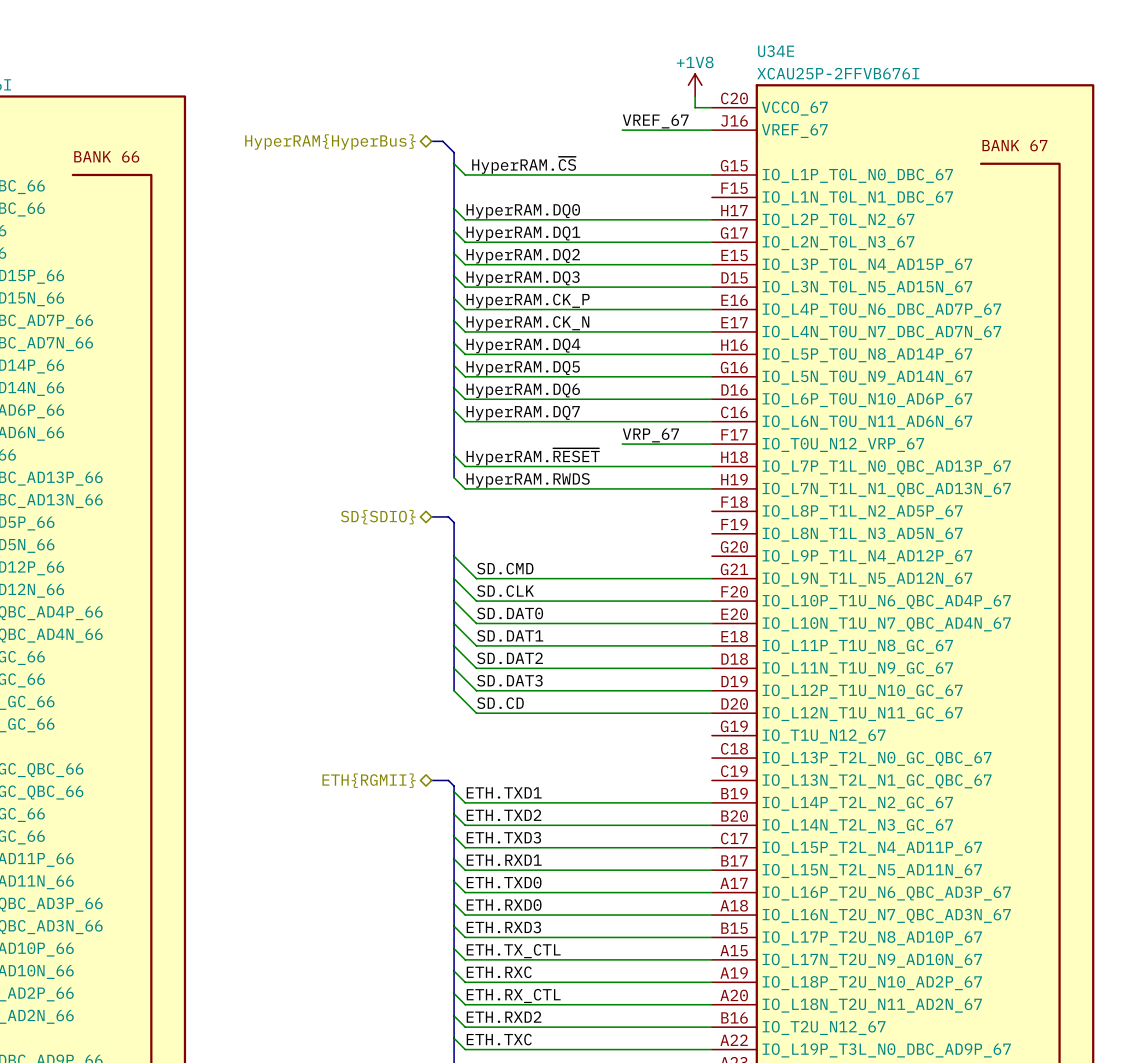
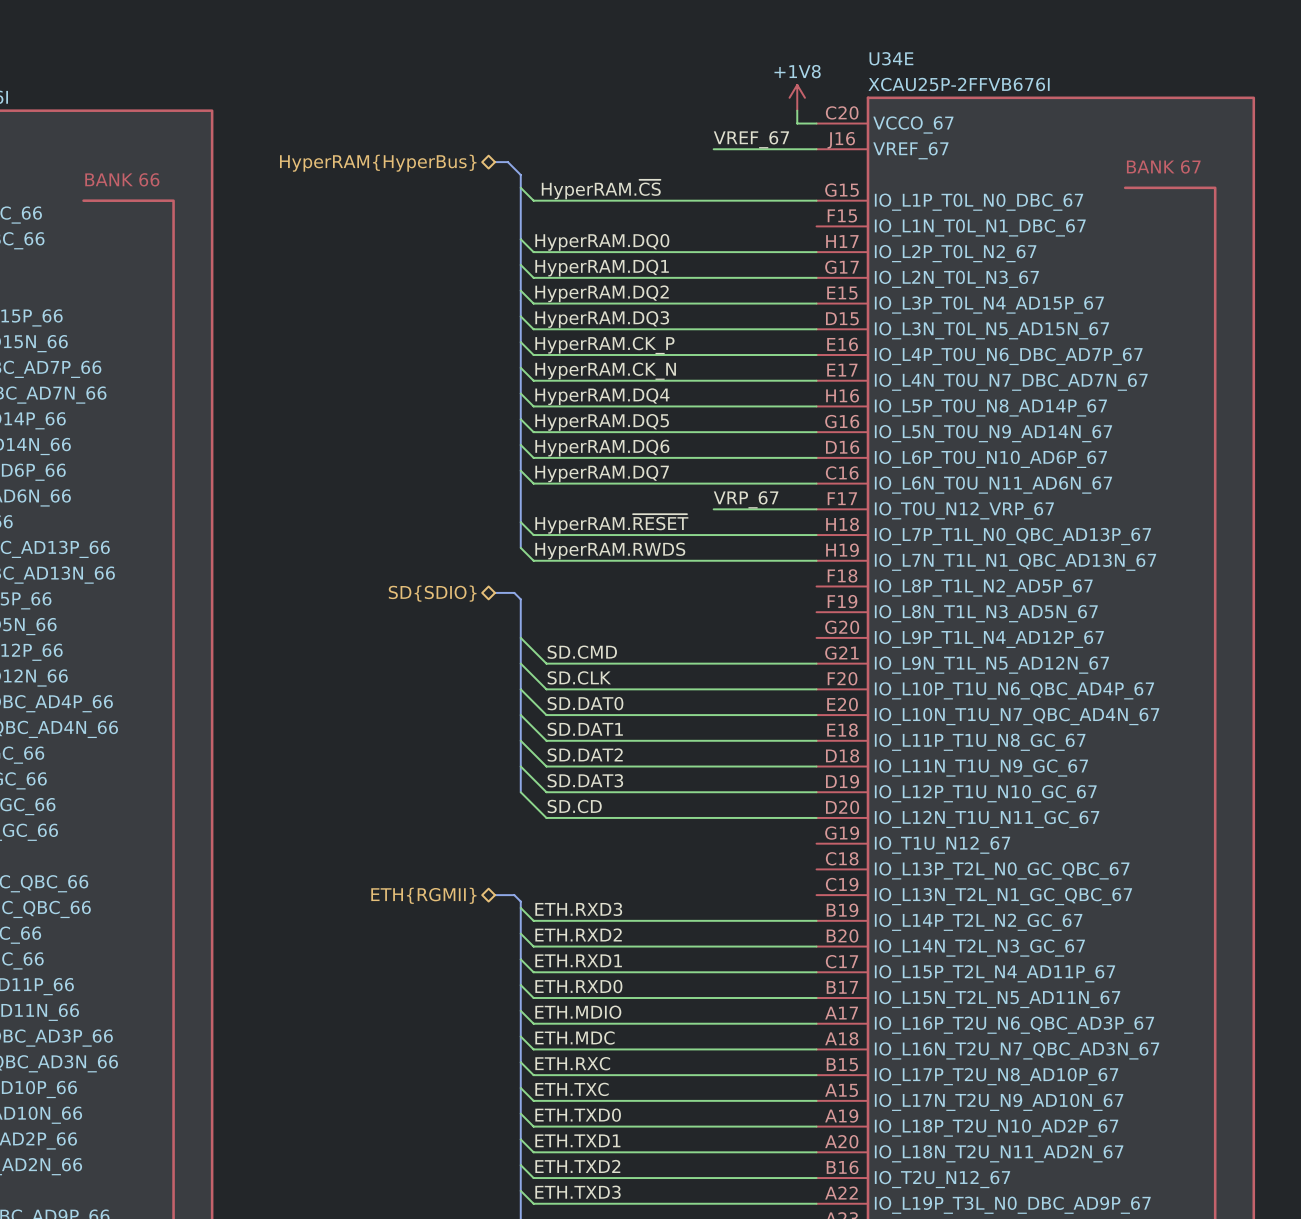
label: ETH.TXD1 (504, 792) -> ETH.RXD3 (578, 909)
label: ETH.TXD2 (504, 815) -> ETH.RXD2 (578, 934)
label: ETH.TXD3 (503, 837) -> ETH.RXD1 (578, 960)
label: ETH.RXD1 (504, 860) -> ETH.RXD0 (578, 986)
label: ETH.TXD0 (504, 882) -> ETH.MDIO (578, 1012)
label: ETH.RXD0 (504, 905) -> ETH.MDC (574, 1037)
label: ETH.RXD3 (503, 927) -> ETH.RXC (572, 1063)
label: ETH.TX_CTL (513, 951) -> ETH.TXC (572, 1089)
label: ETH.RXC (499, 972) -> ETH.TXD0 (578, 1115)
label: ETH.RX_CTL (513, 995) -> ETH.TXD1 (577, 1140)
label: ETH.RXD2 (504, 1017) -> ETH.TXD2 (577, 1166)
label: ETH.TXC (499, 1039) -> ETH.TXD3 (578, 1192)

